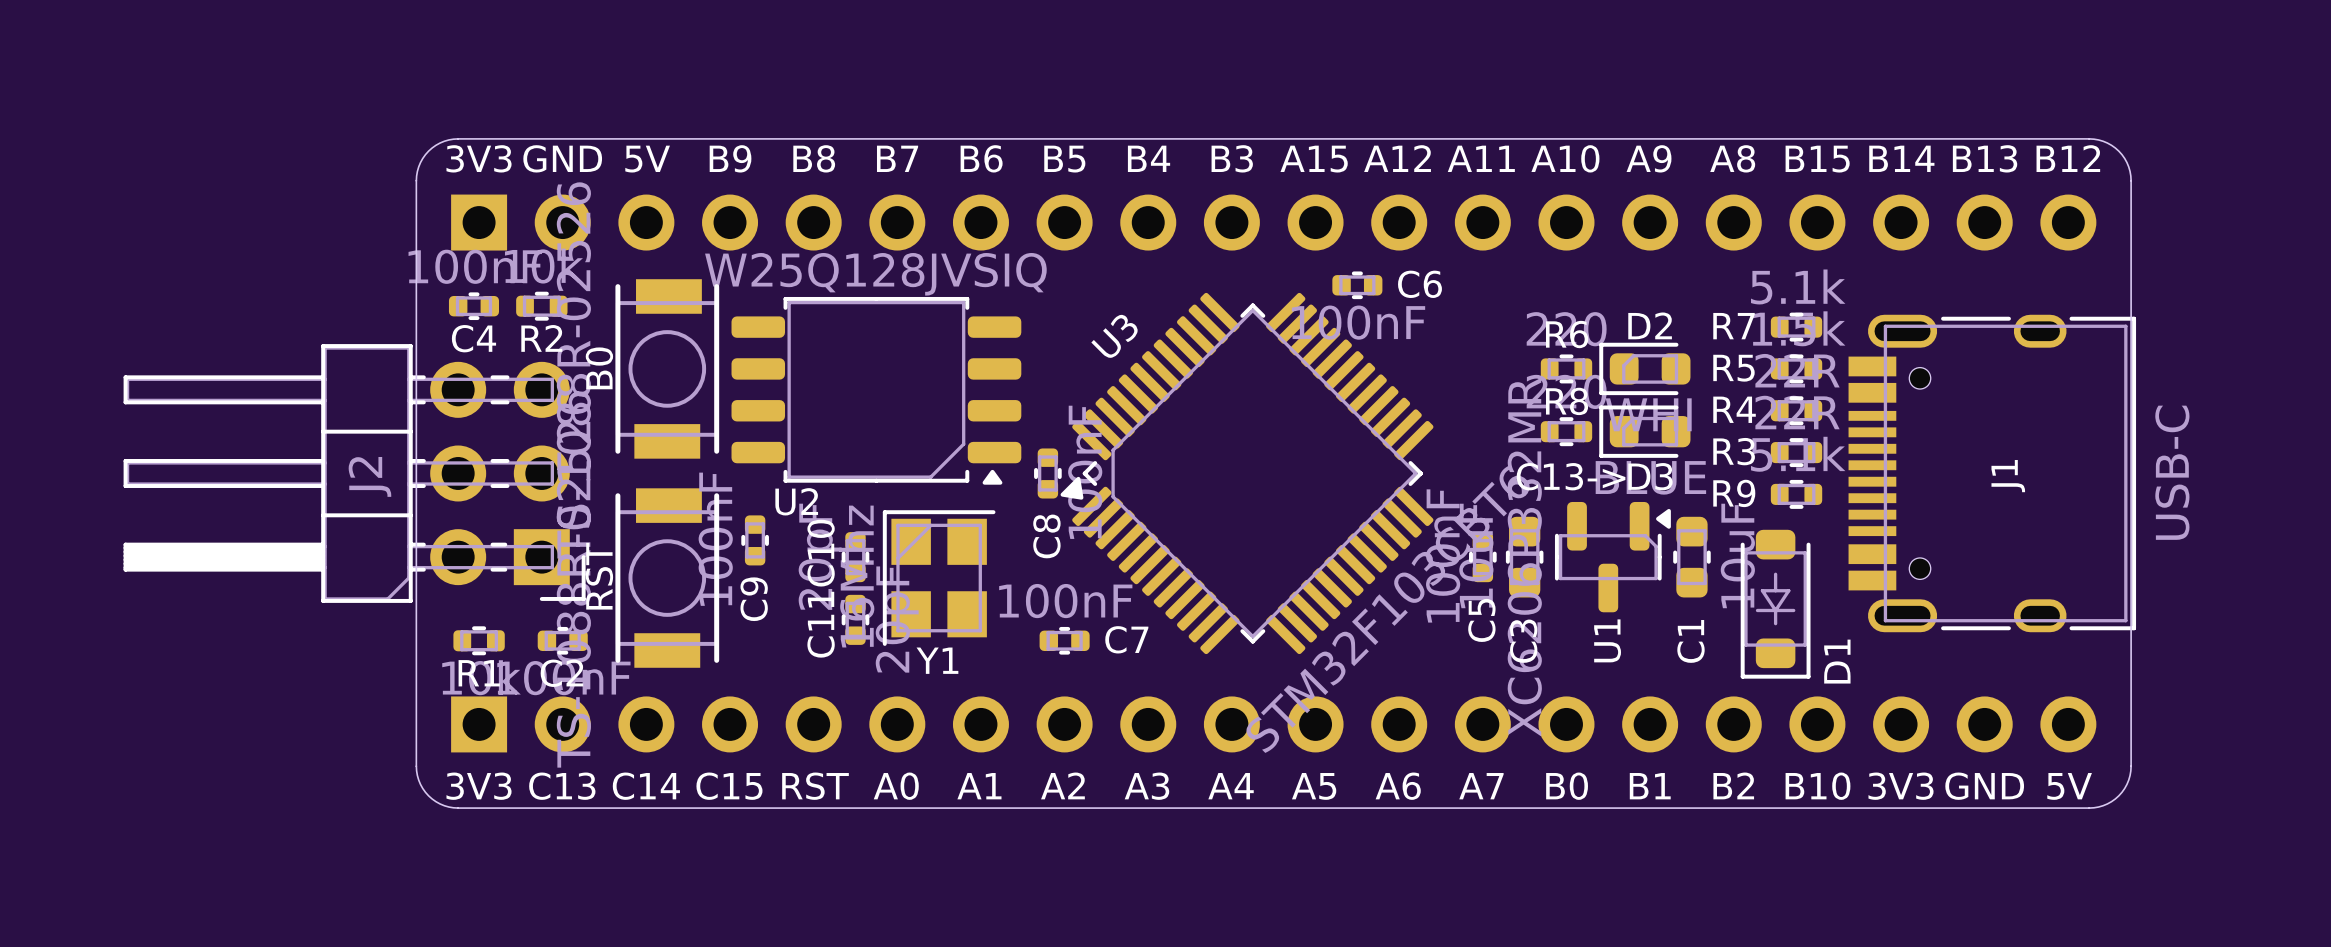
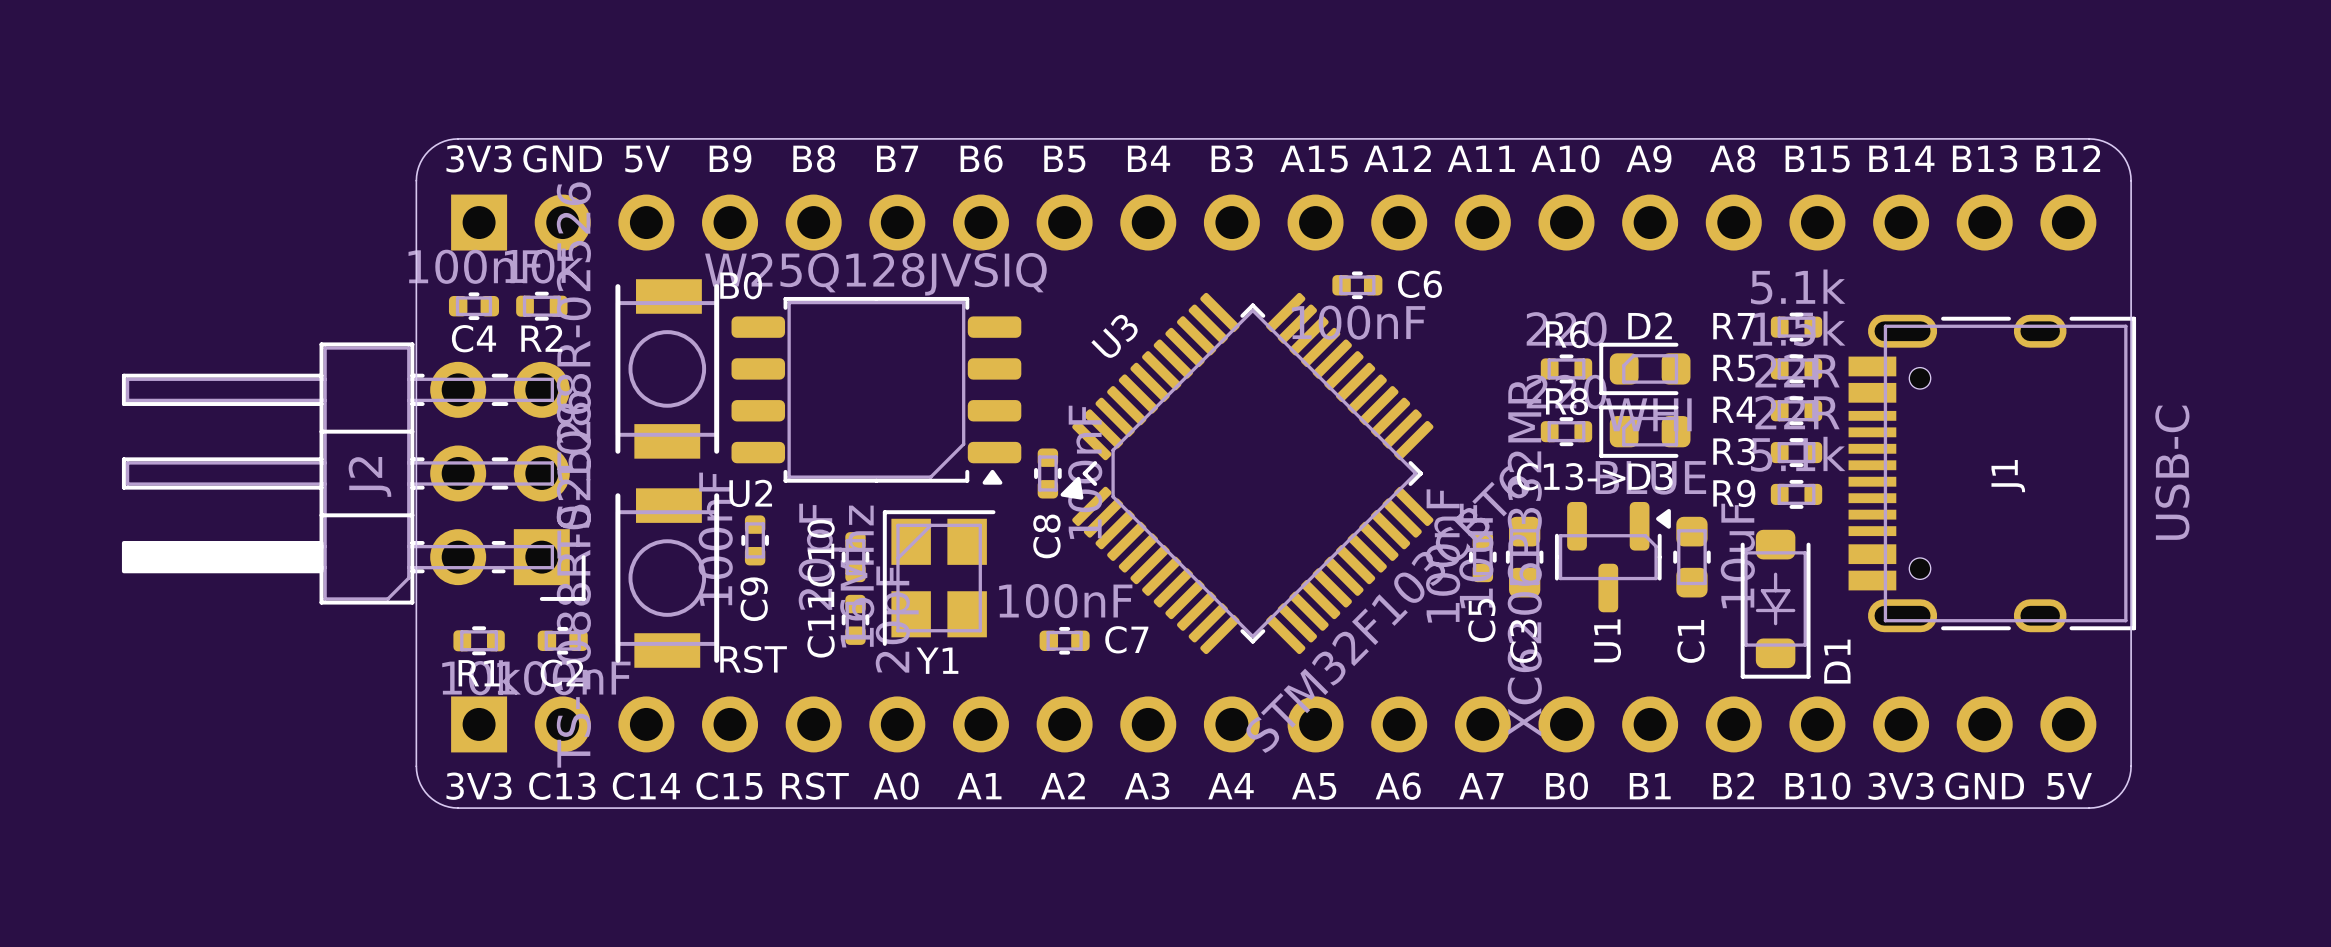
J2 footprint: [123, 344, 586, 603] -> [121, 342, 586, 605]
text rotation: 0° (599, 368) -> 90° clockwise (741, 285)
text position: B0 (599, 368) -> B0 (741, 285)
U2 name position: U2 (796, 501) -> U2 (750, 493)
text rotation: 0° (599, 576) -> 90° clockwise (753, 659)
text position: RST (599, 576) -> RST (753, 659)

